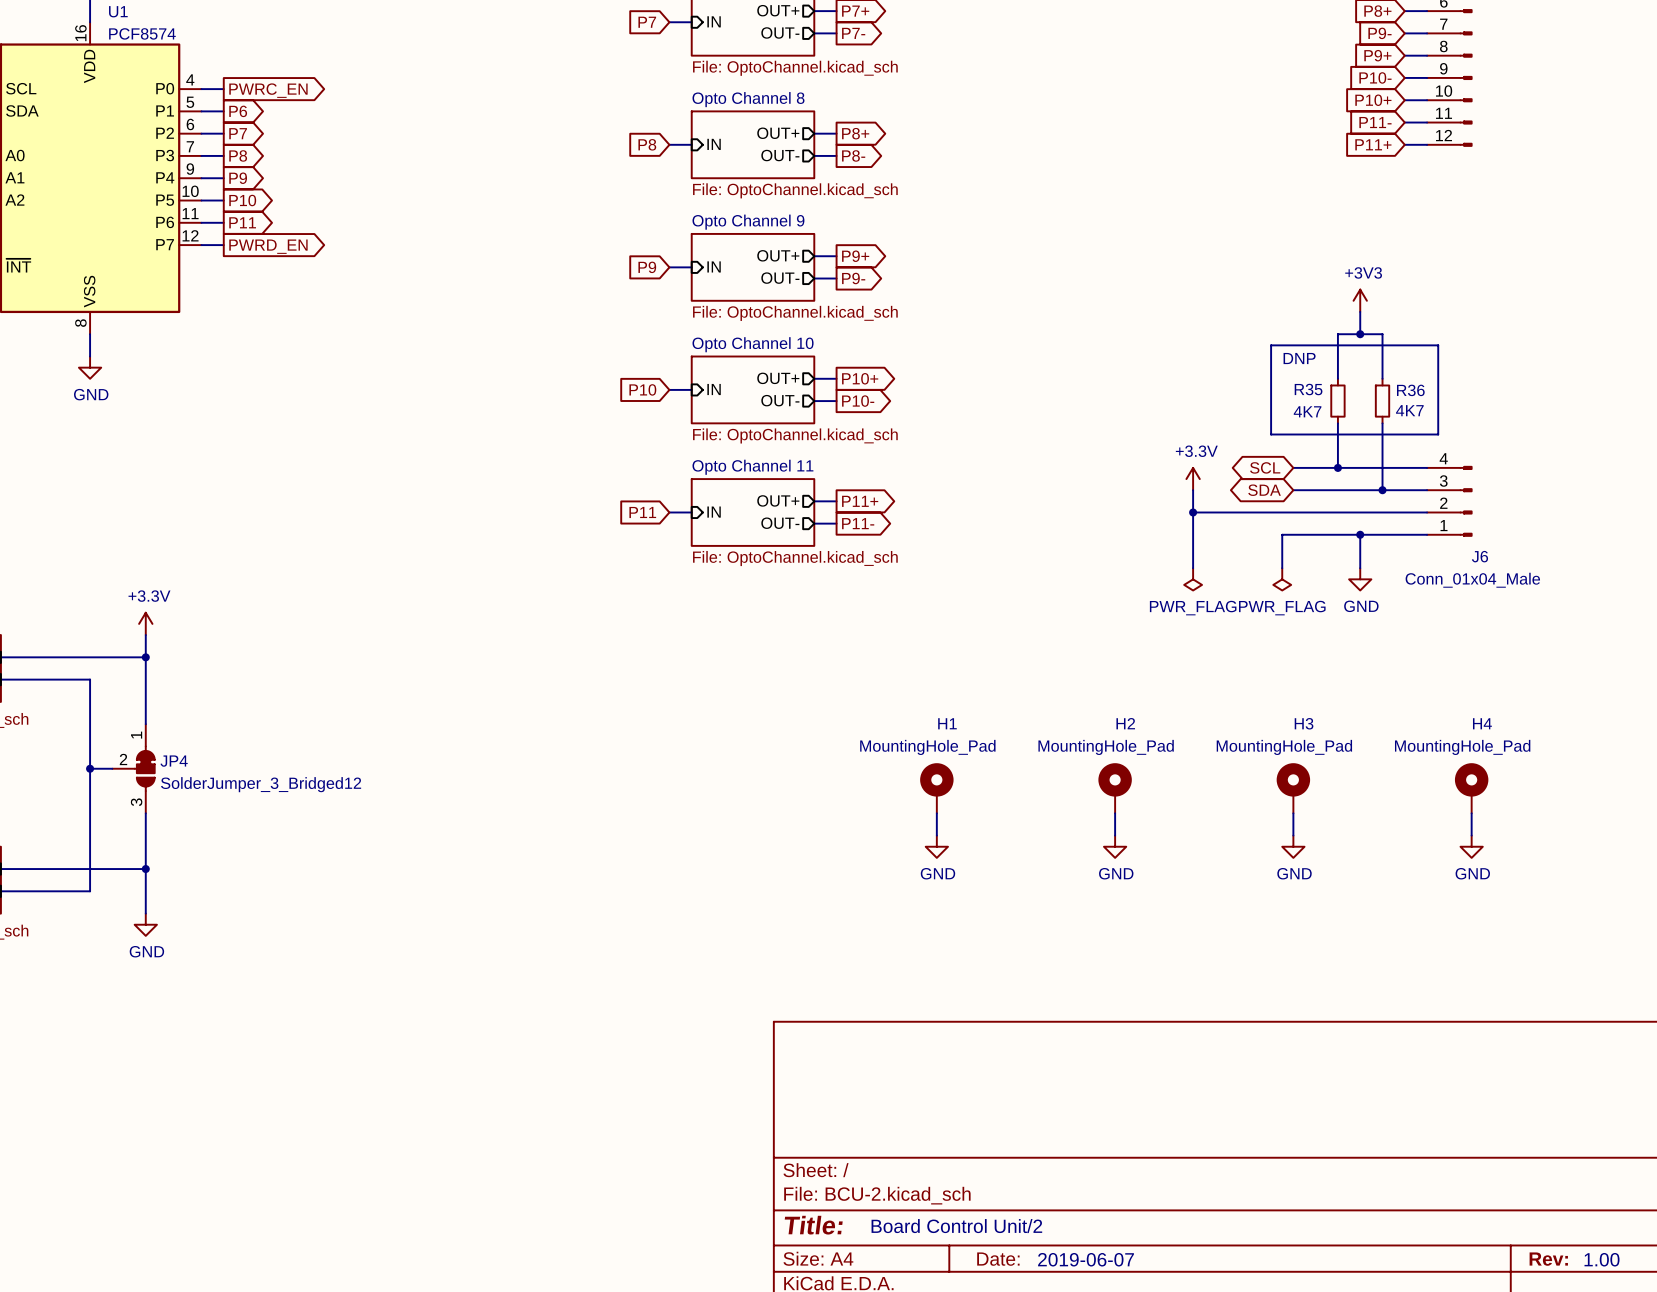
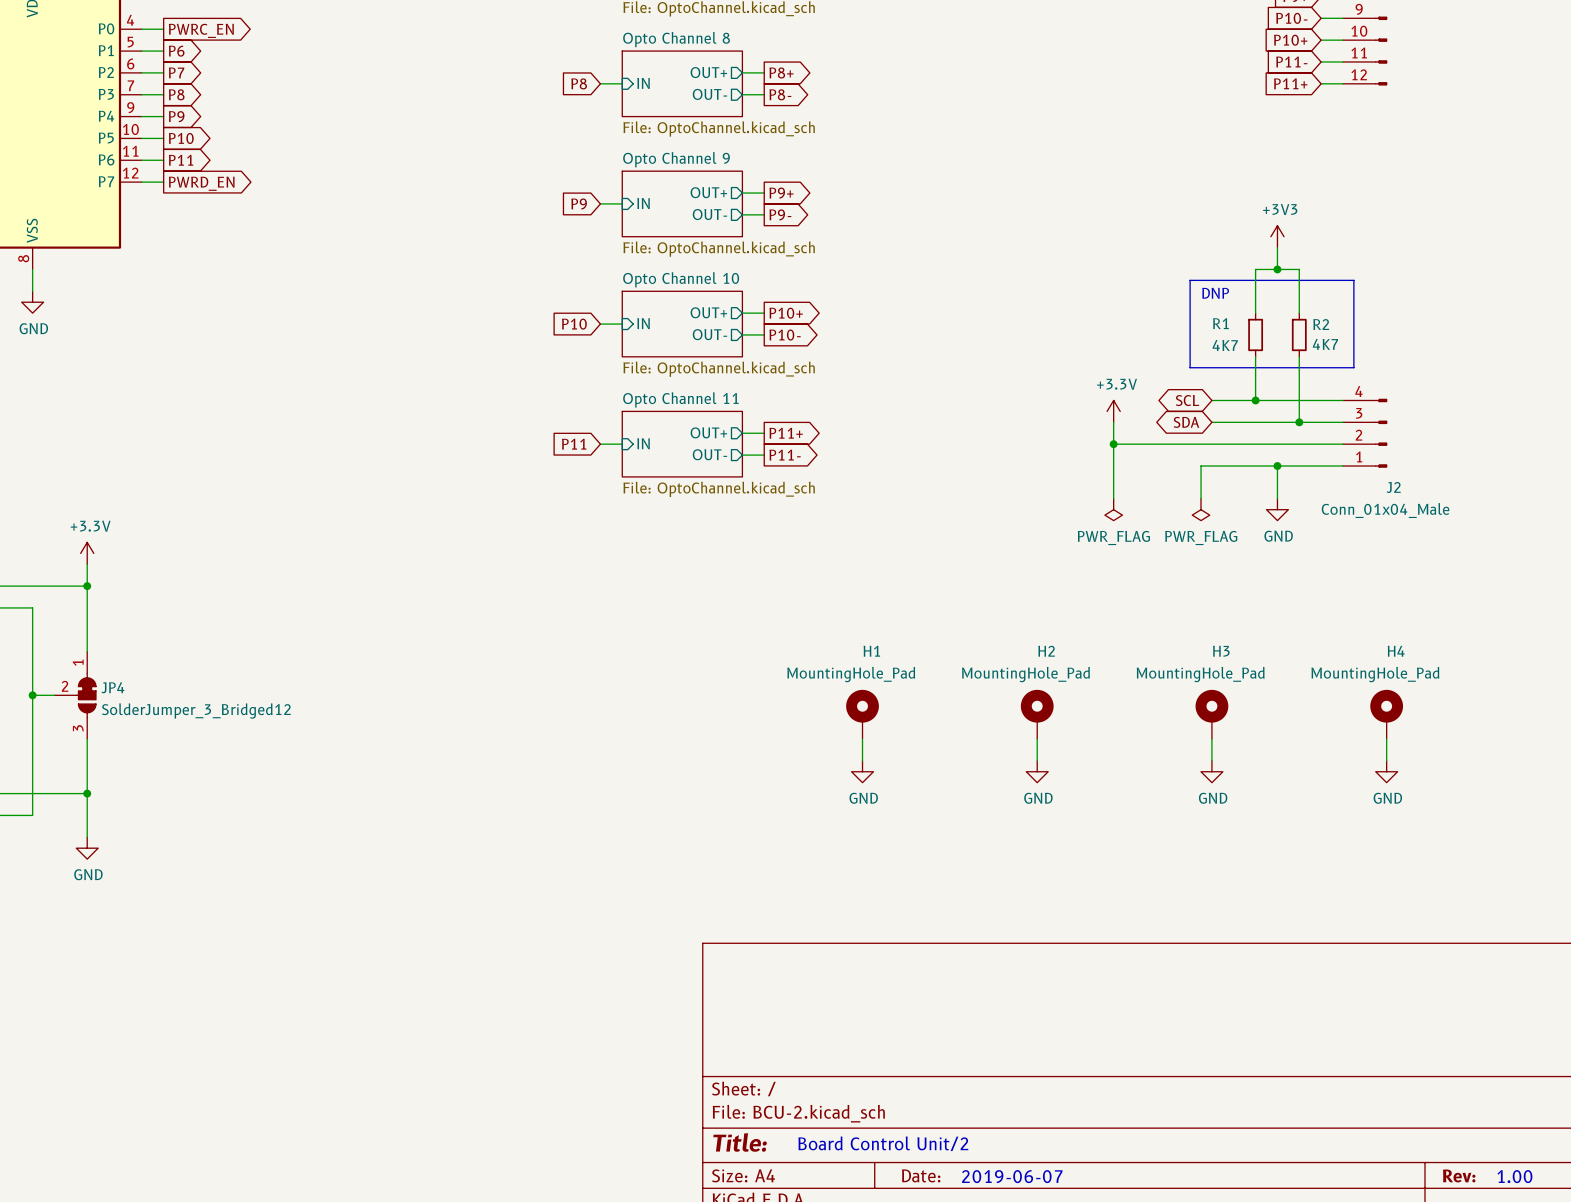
R35 name: R35 (1308, 389) -> R1 (1220, 323)
R36 name: R36 (1410, 390) -> R2 (1321, 324)
J6 name: J6 (1479, 556) -> J2 (1393, 487)

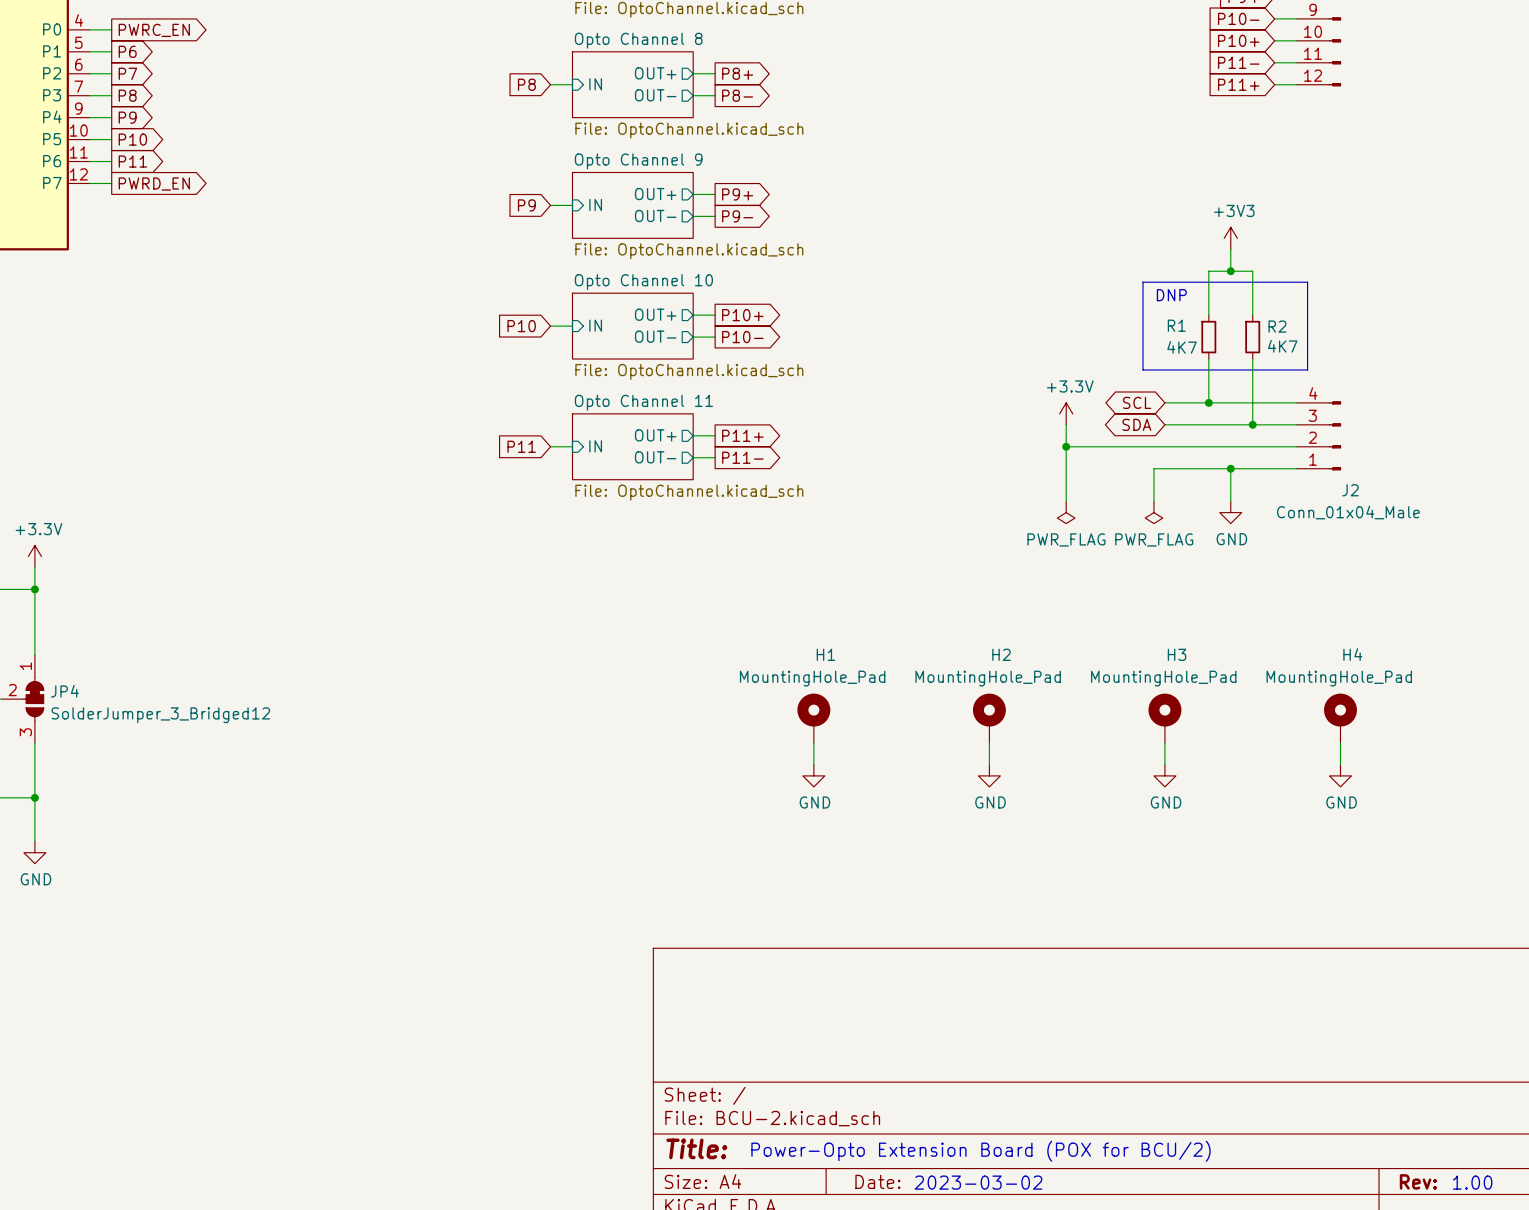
text: Board Control Unit/2 (883, 1143) -> Power-Opto Extension Board (POX for BCU/2) (981, 1151)
text: 2019-06-07 (1012, 1176) -> 2023-03-02 (978, 1182)

